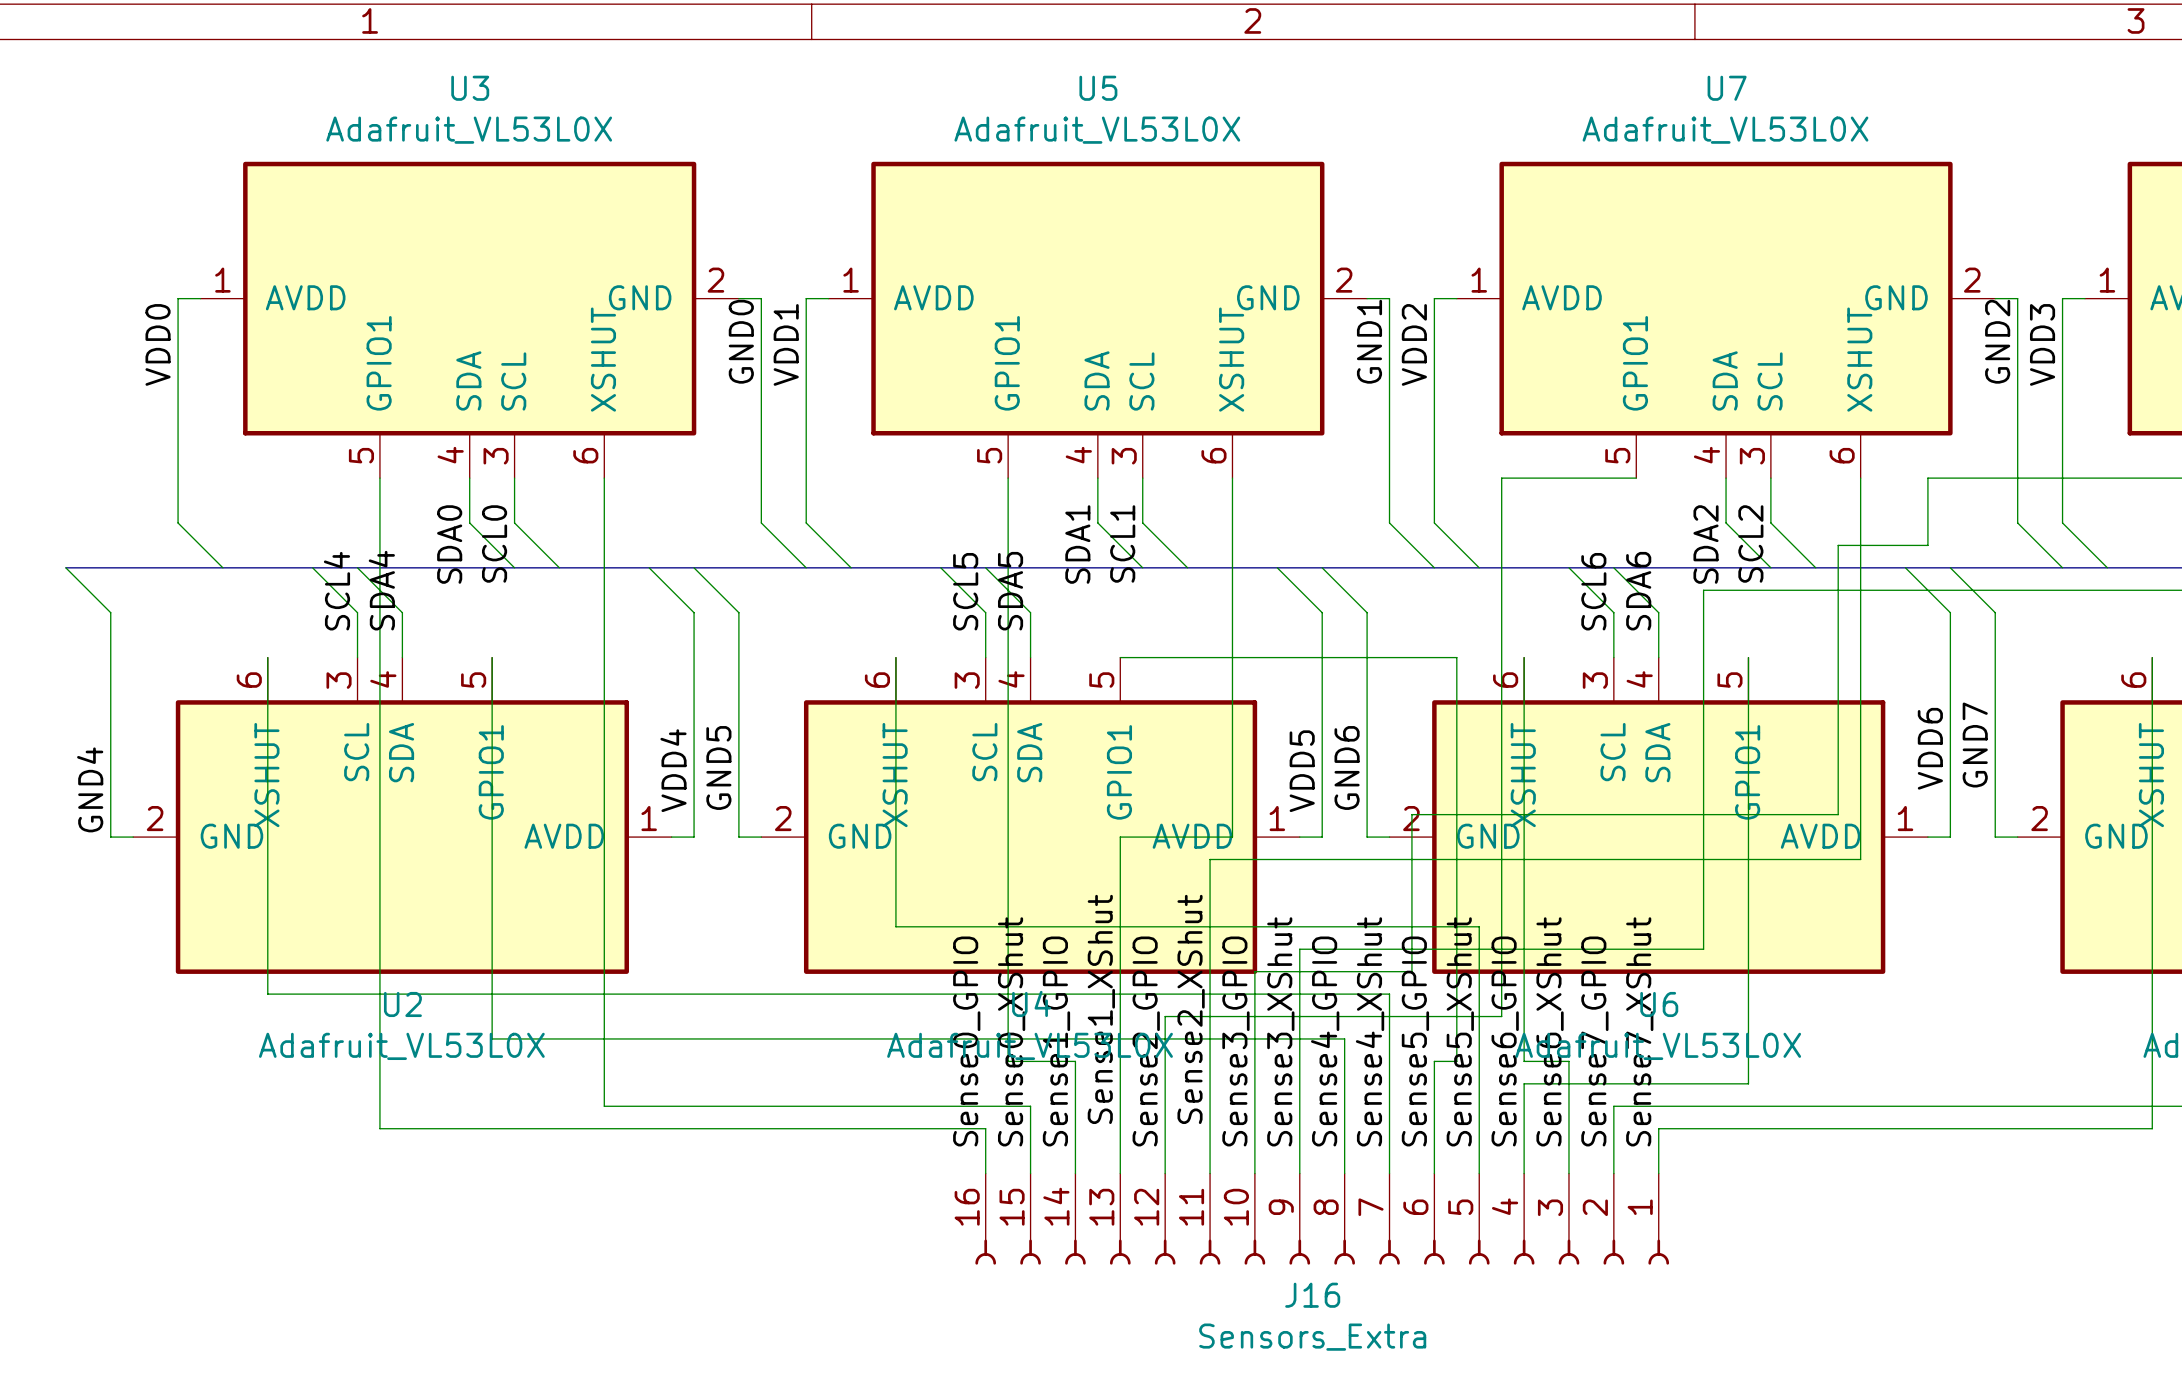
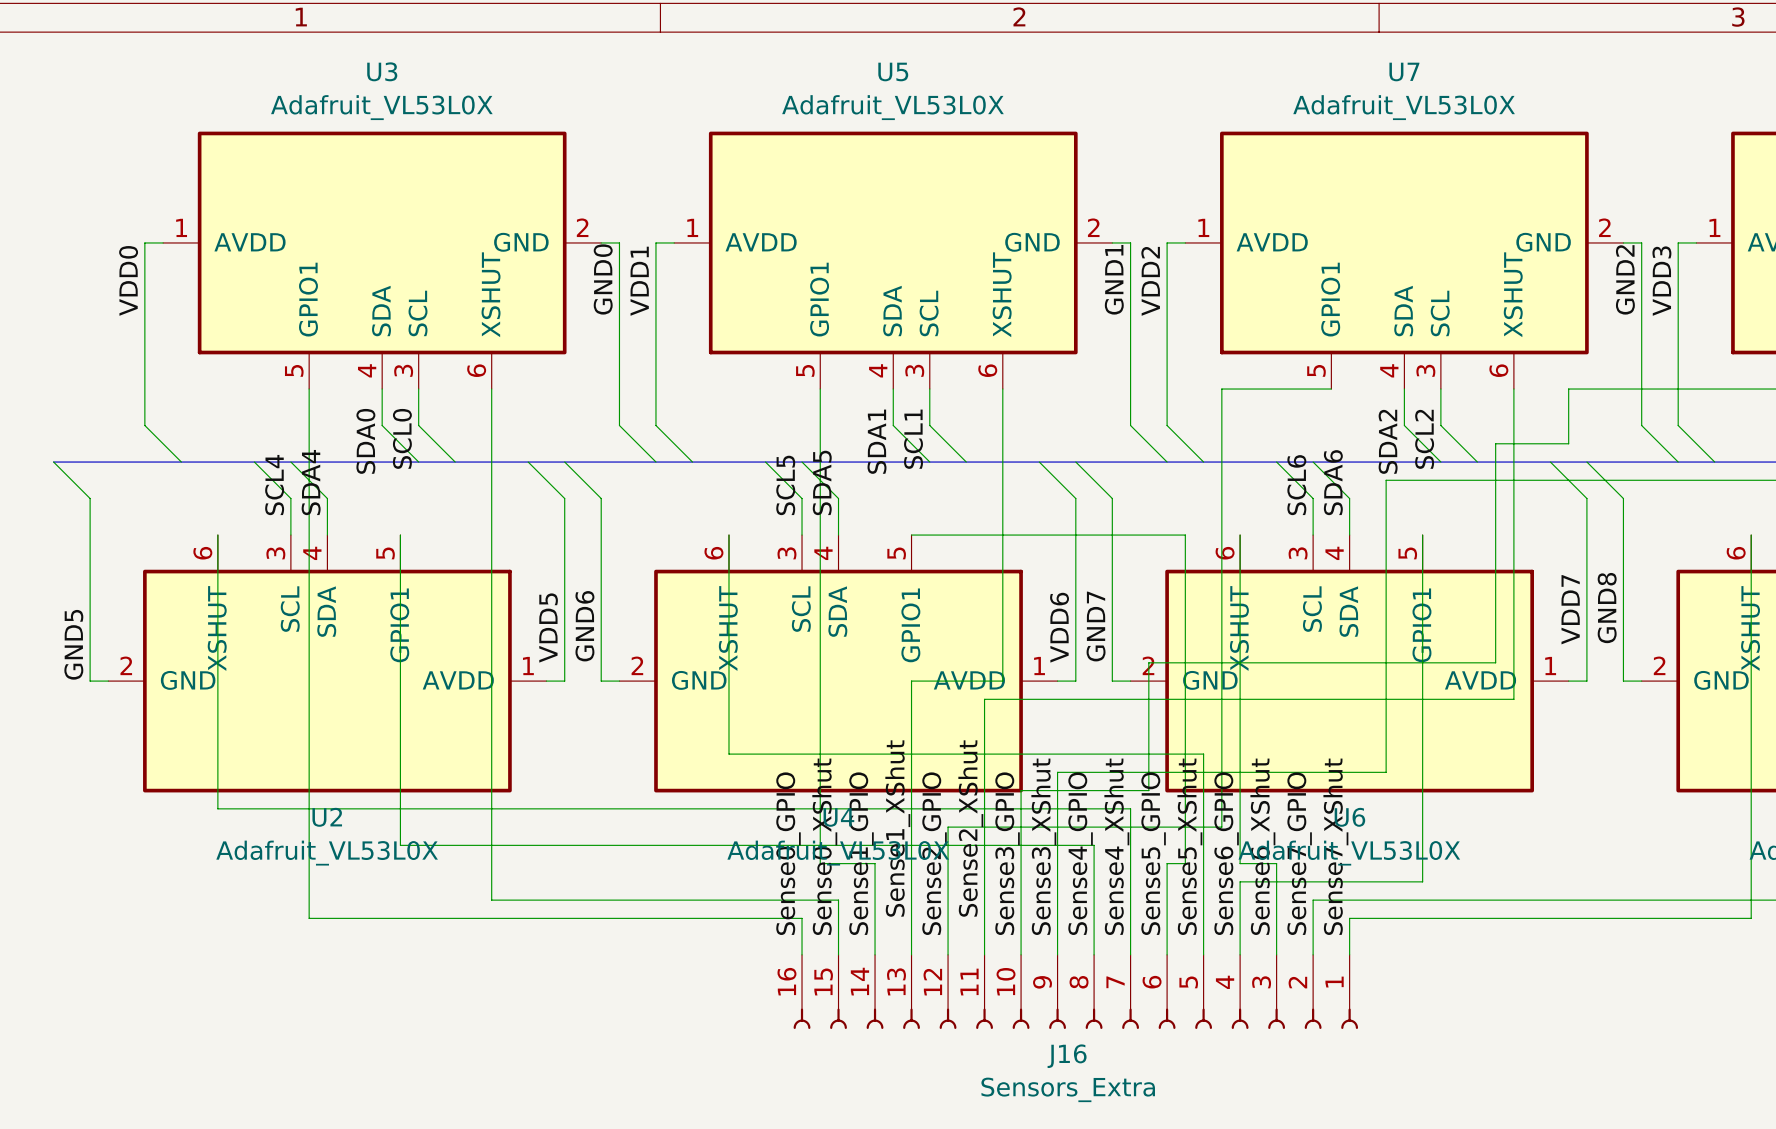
label: GND7 (1975, 745) -> GND8 (1607, 608)
label: VDD6 (1930, 748) -> VDD7 (1570, 609)
label: GND5 (718, 767) -> GND6 (584, 626)
label: GND6 (1347, 767) -> GND7 (1096, 626)
label: VDD4 (673, 770) -> VDD5 (548, 628)
label: VDD5 (1302, 771) -> VDD6 (1059, 627)
label: GND4 (90, 789) -> GND5 (73, 644)

